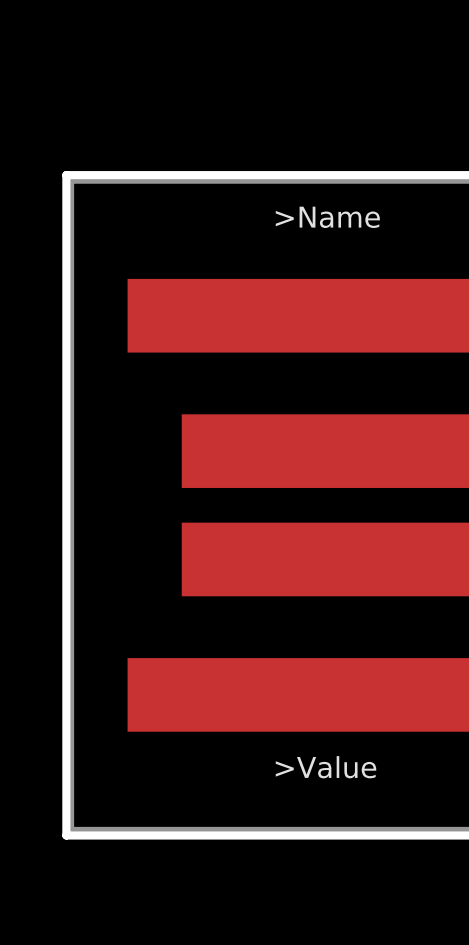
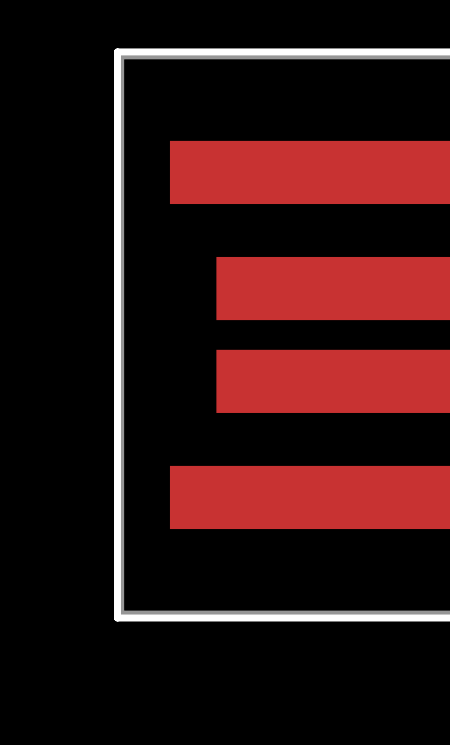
part text: >Name (327, 217) -> none
part text: >Value (326, 767) -> none

